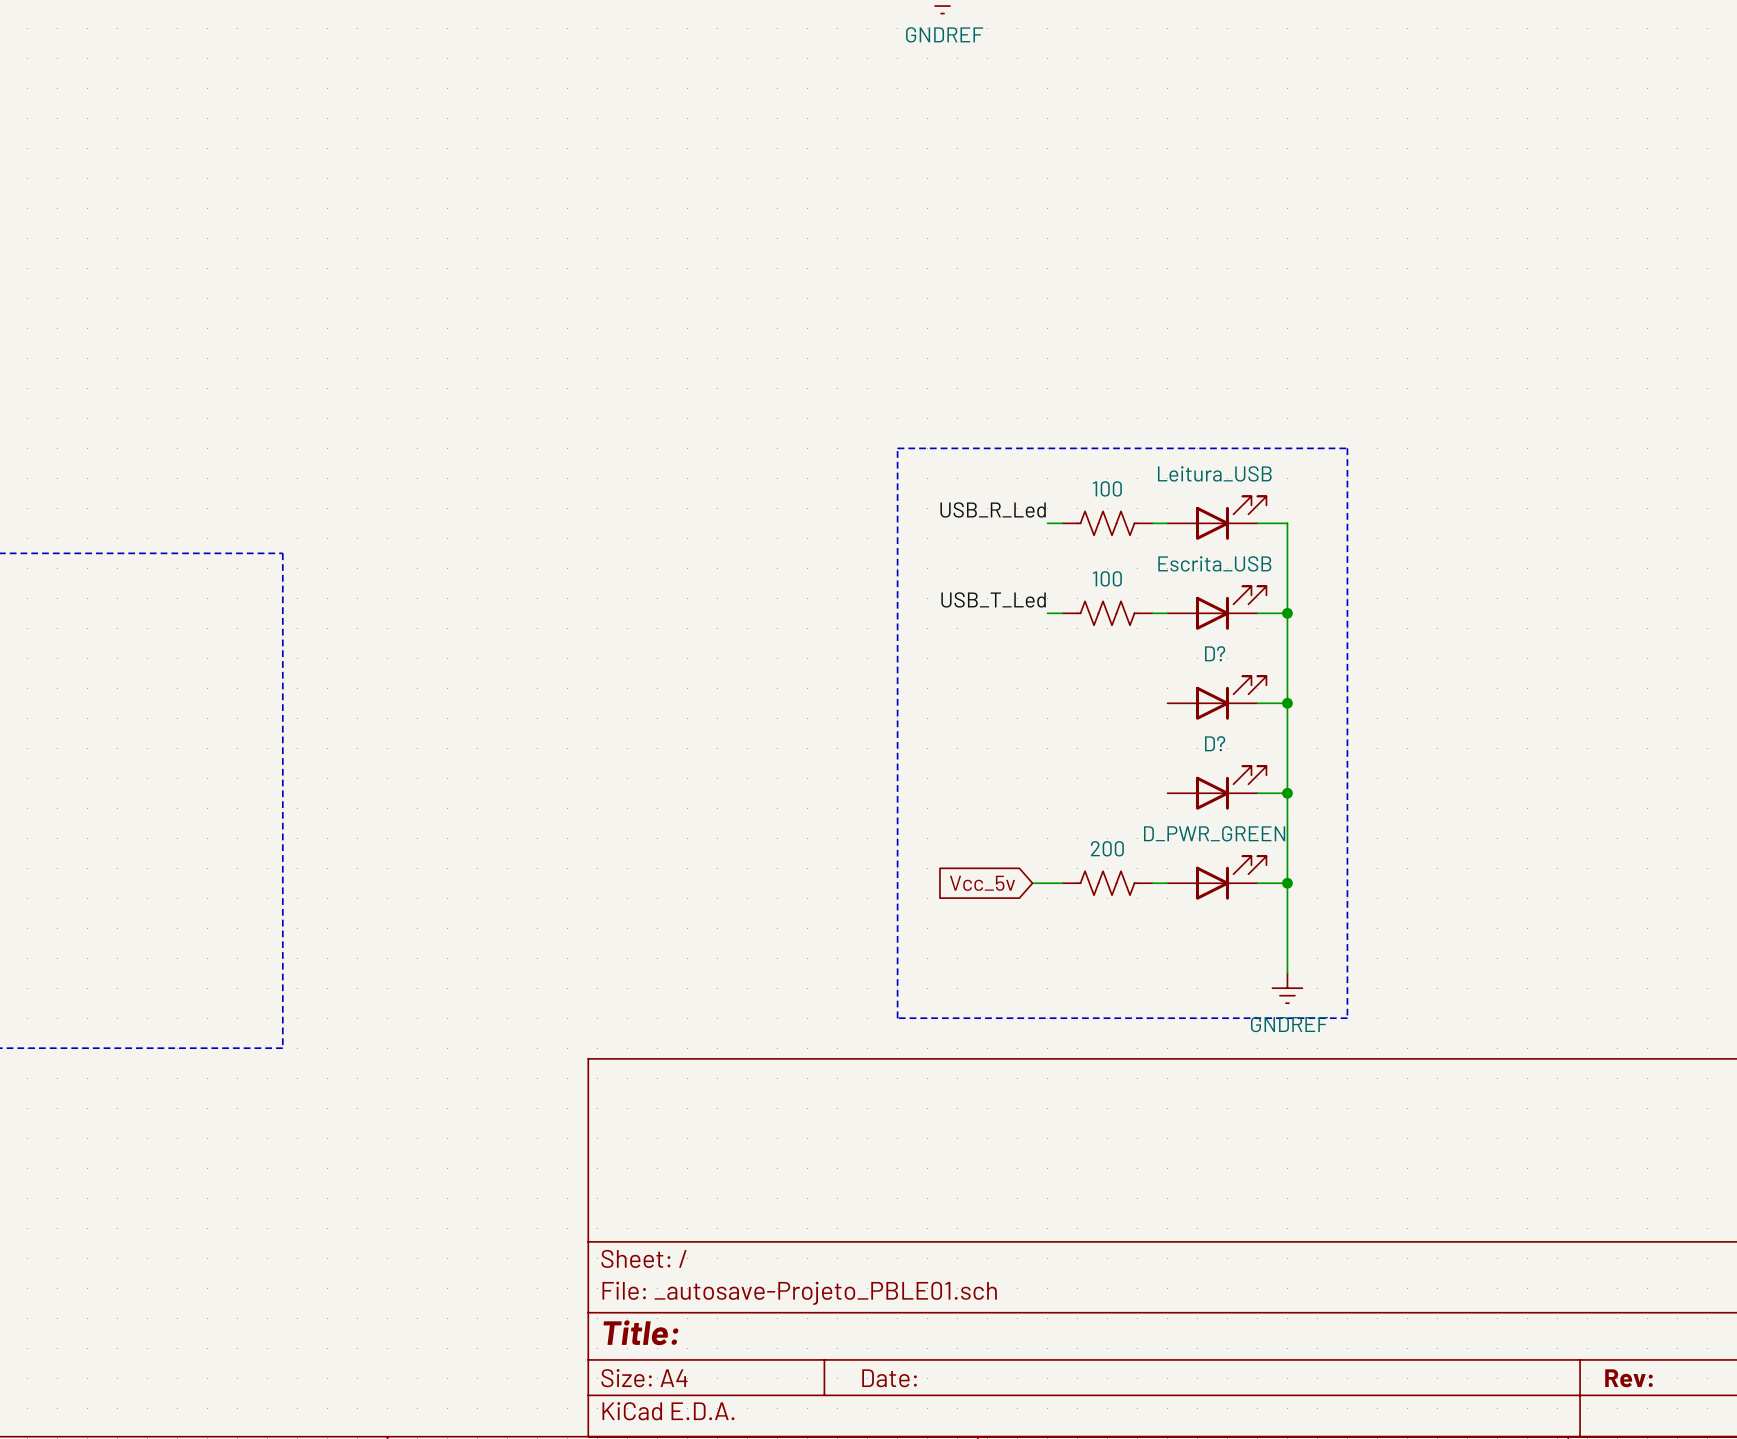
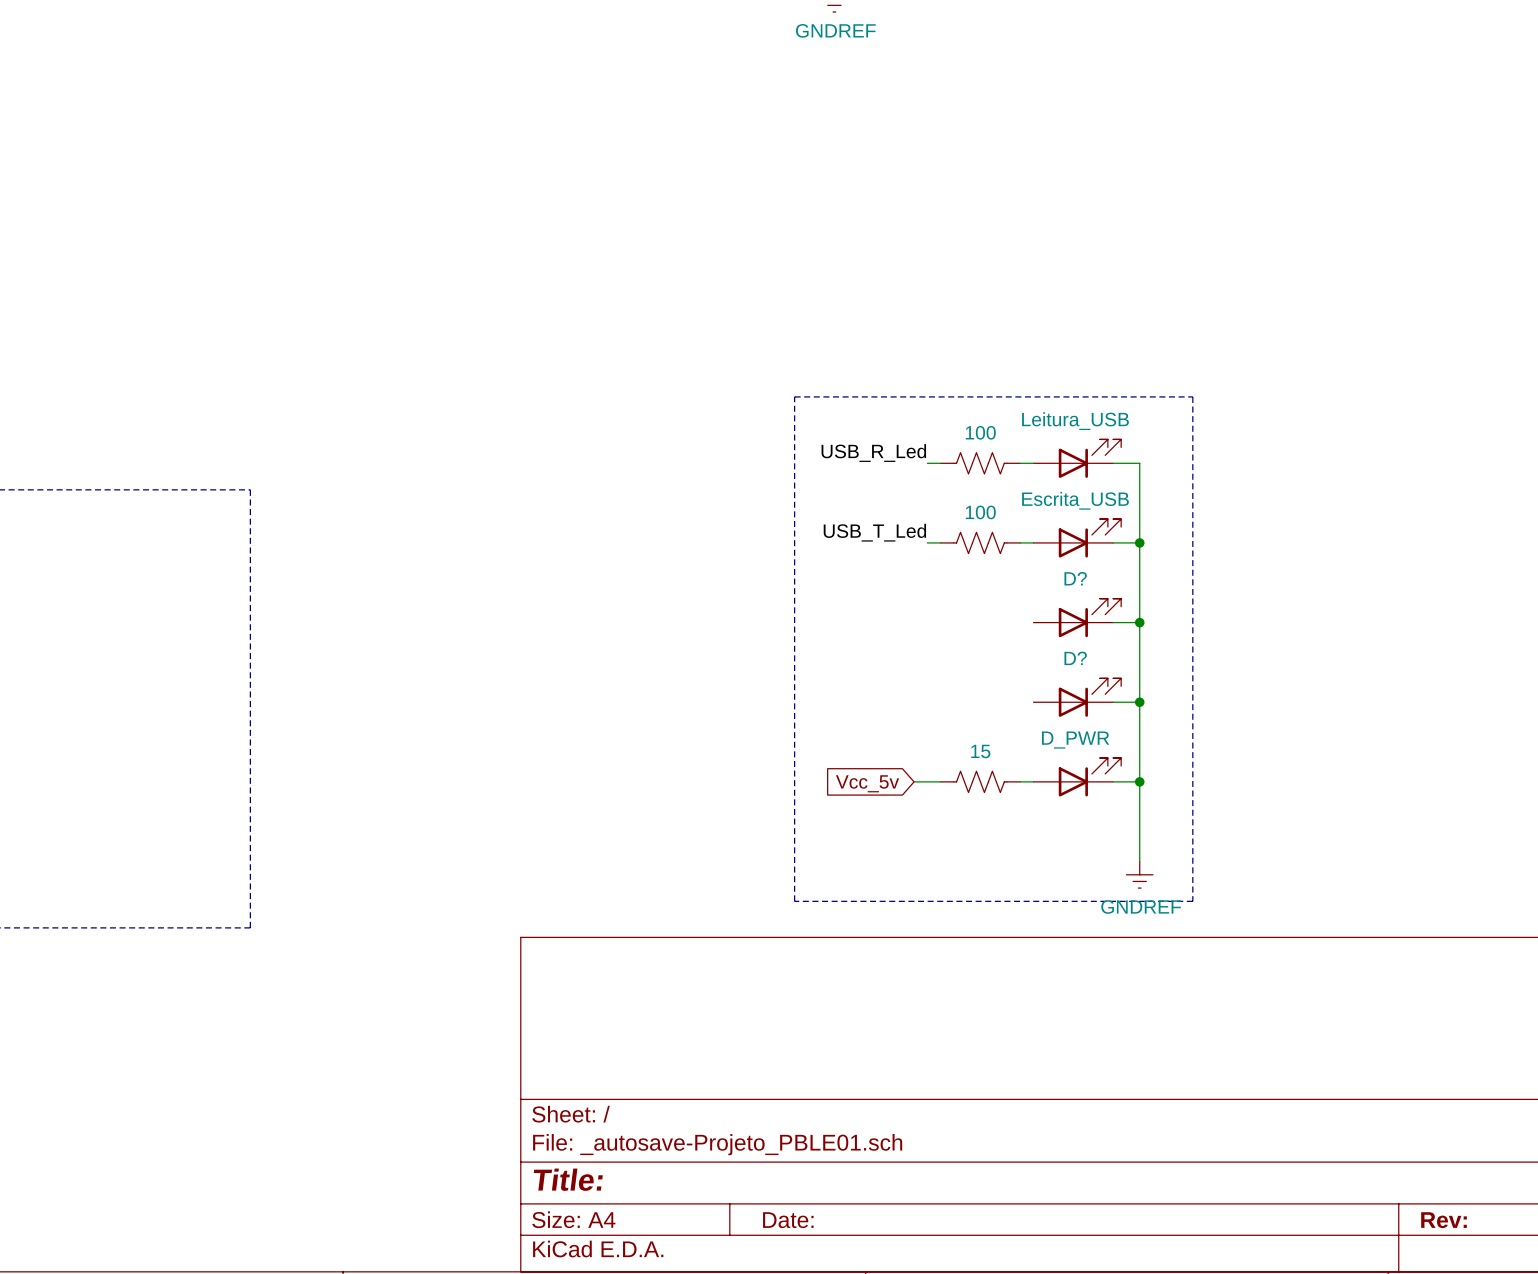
D_PWR_GREEN name: D_PWR_GREEN (1214, 833) -> D_PWR (1075, 740)
part value: 200 (1107, 848) -> 15 (980, 751)

